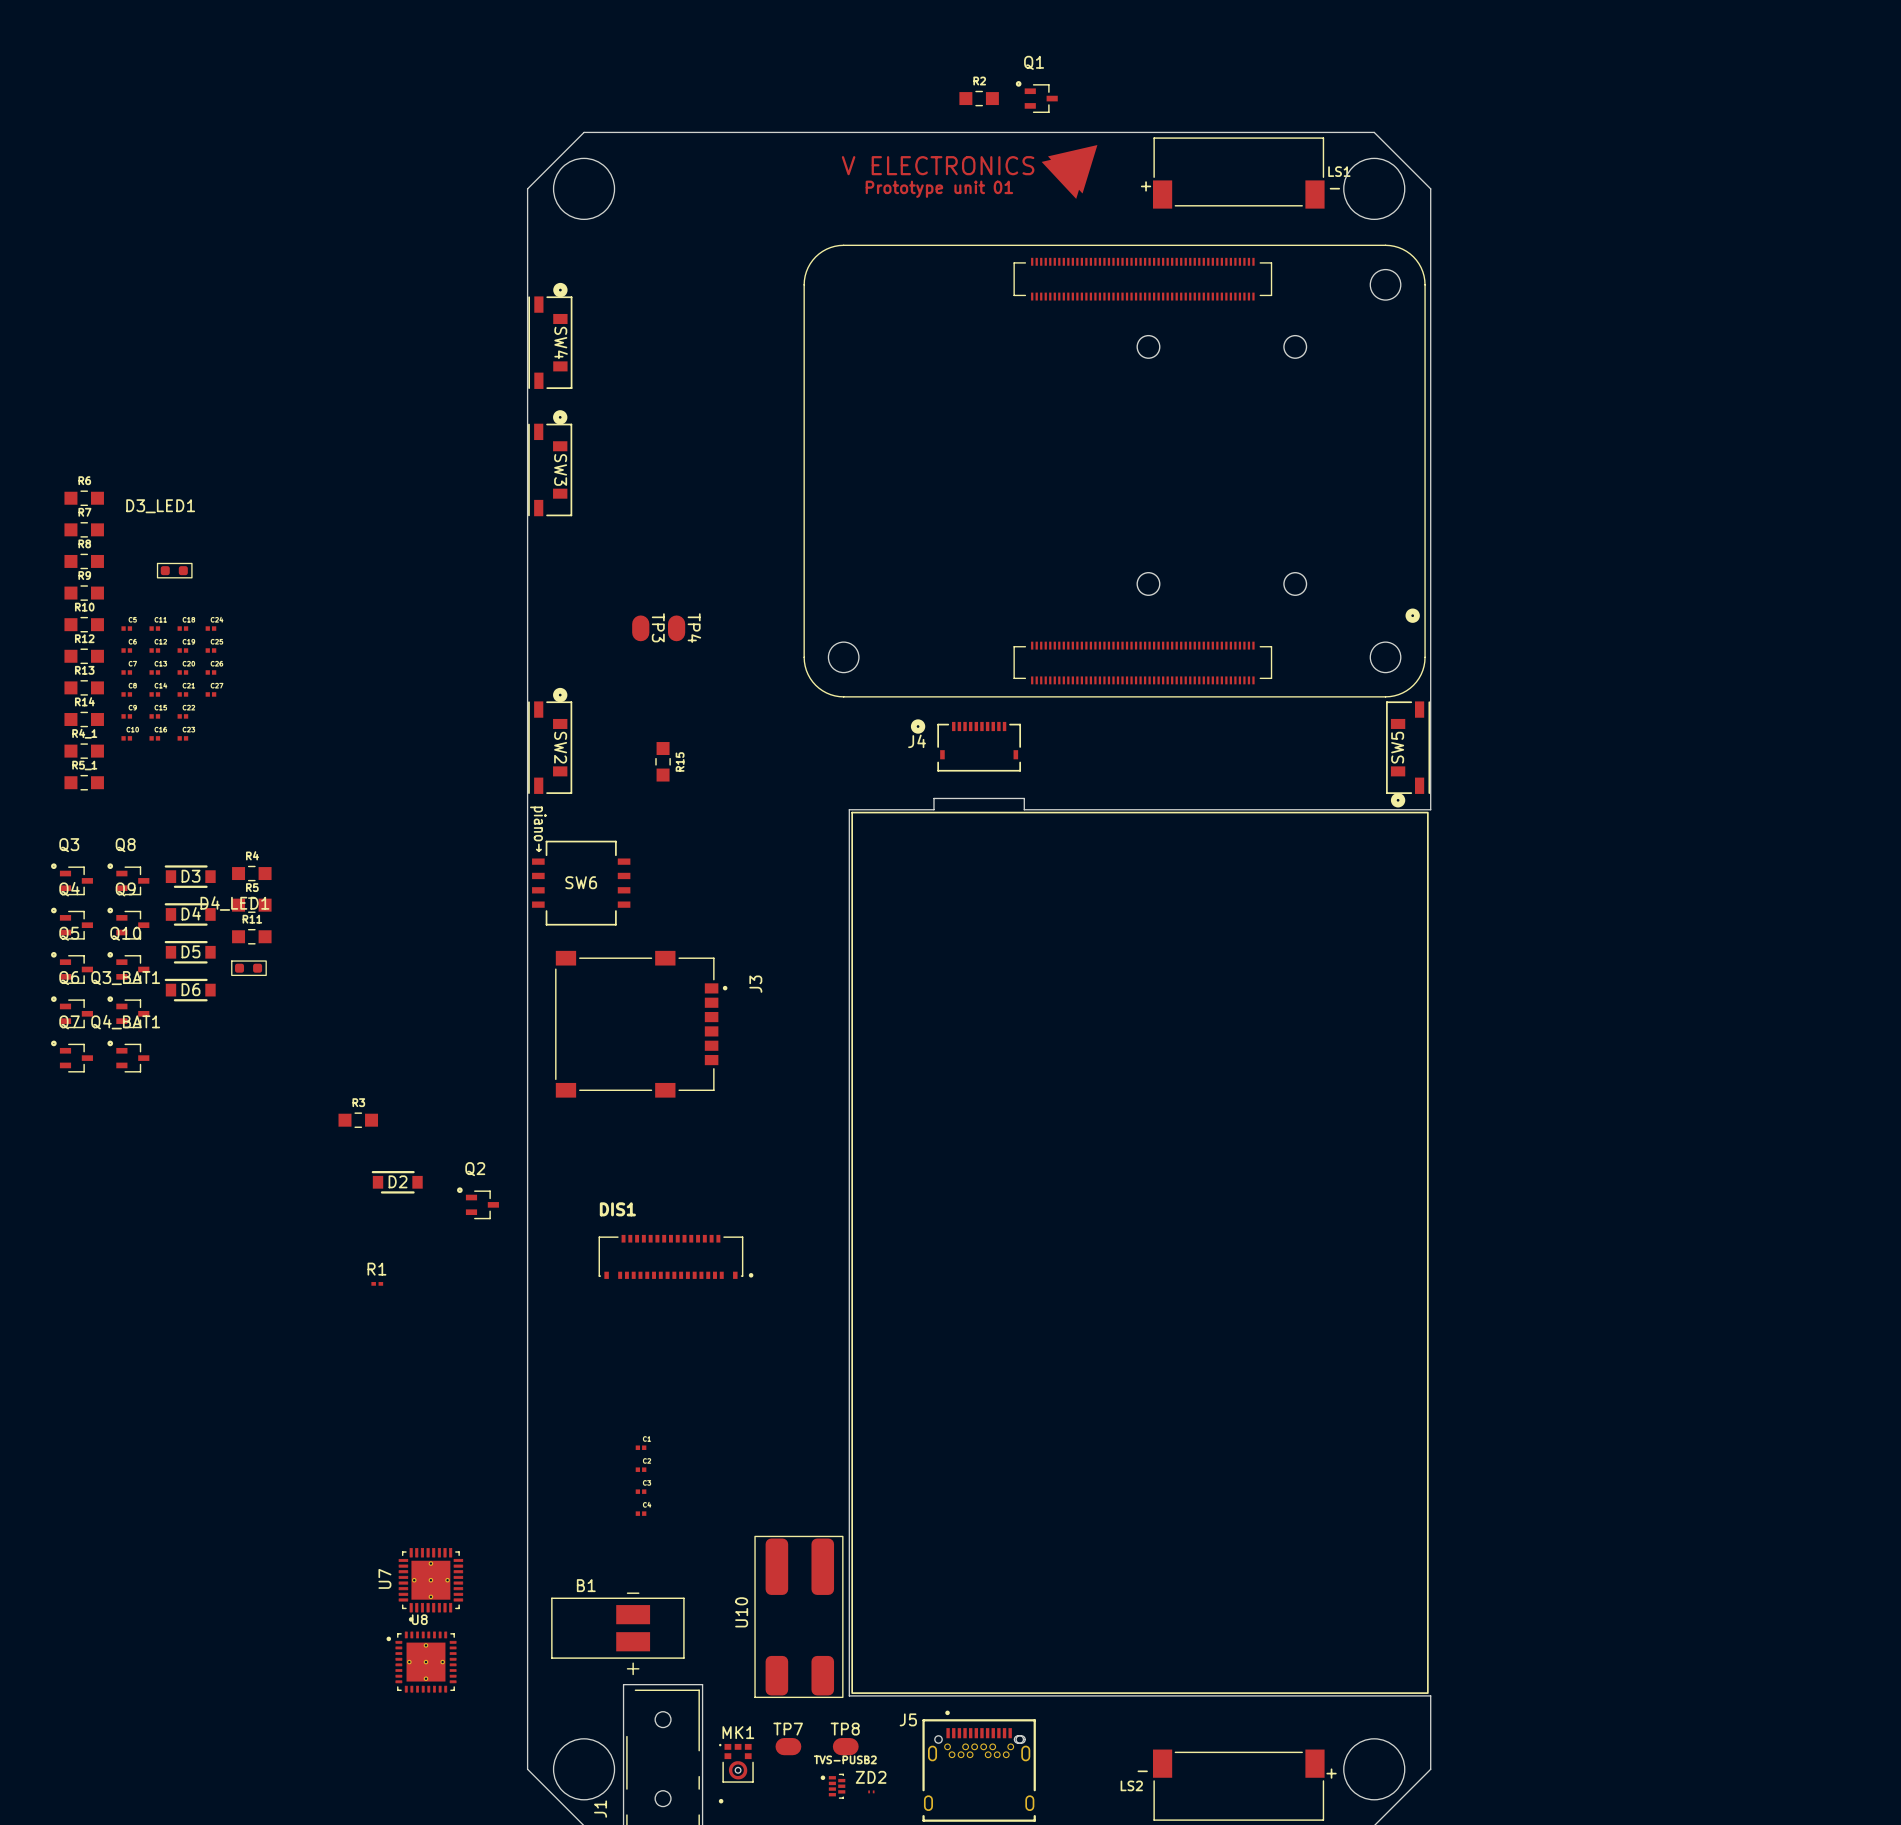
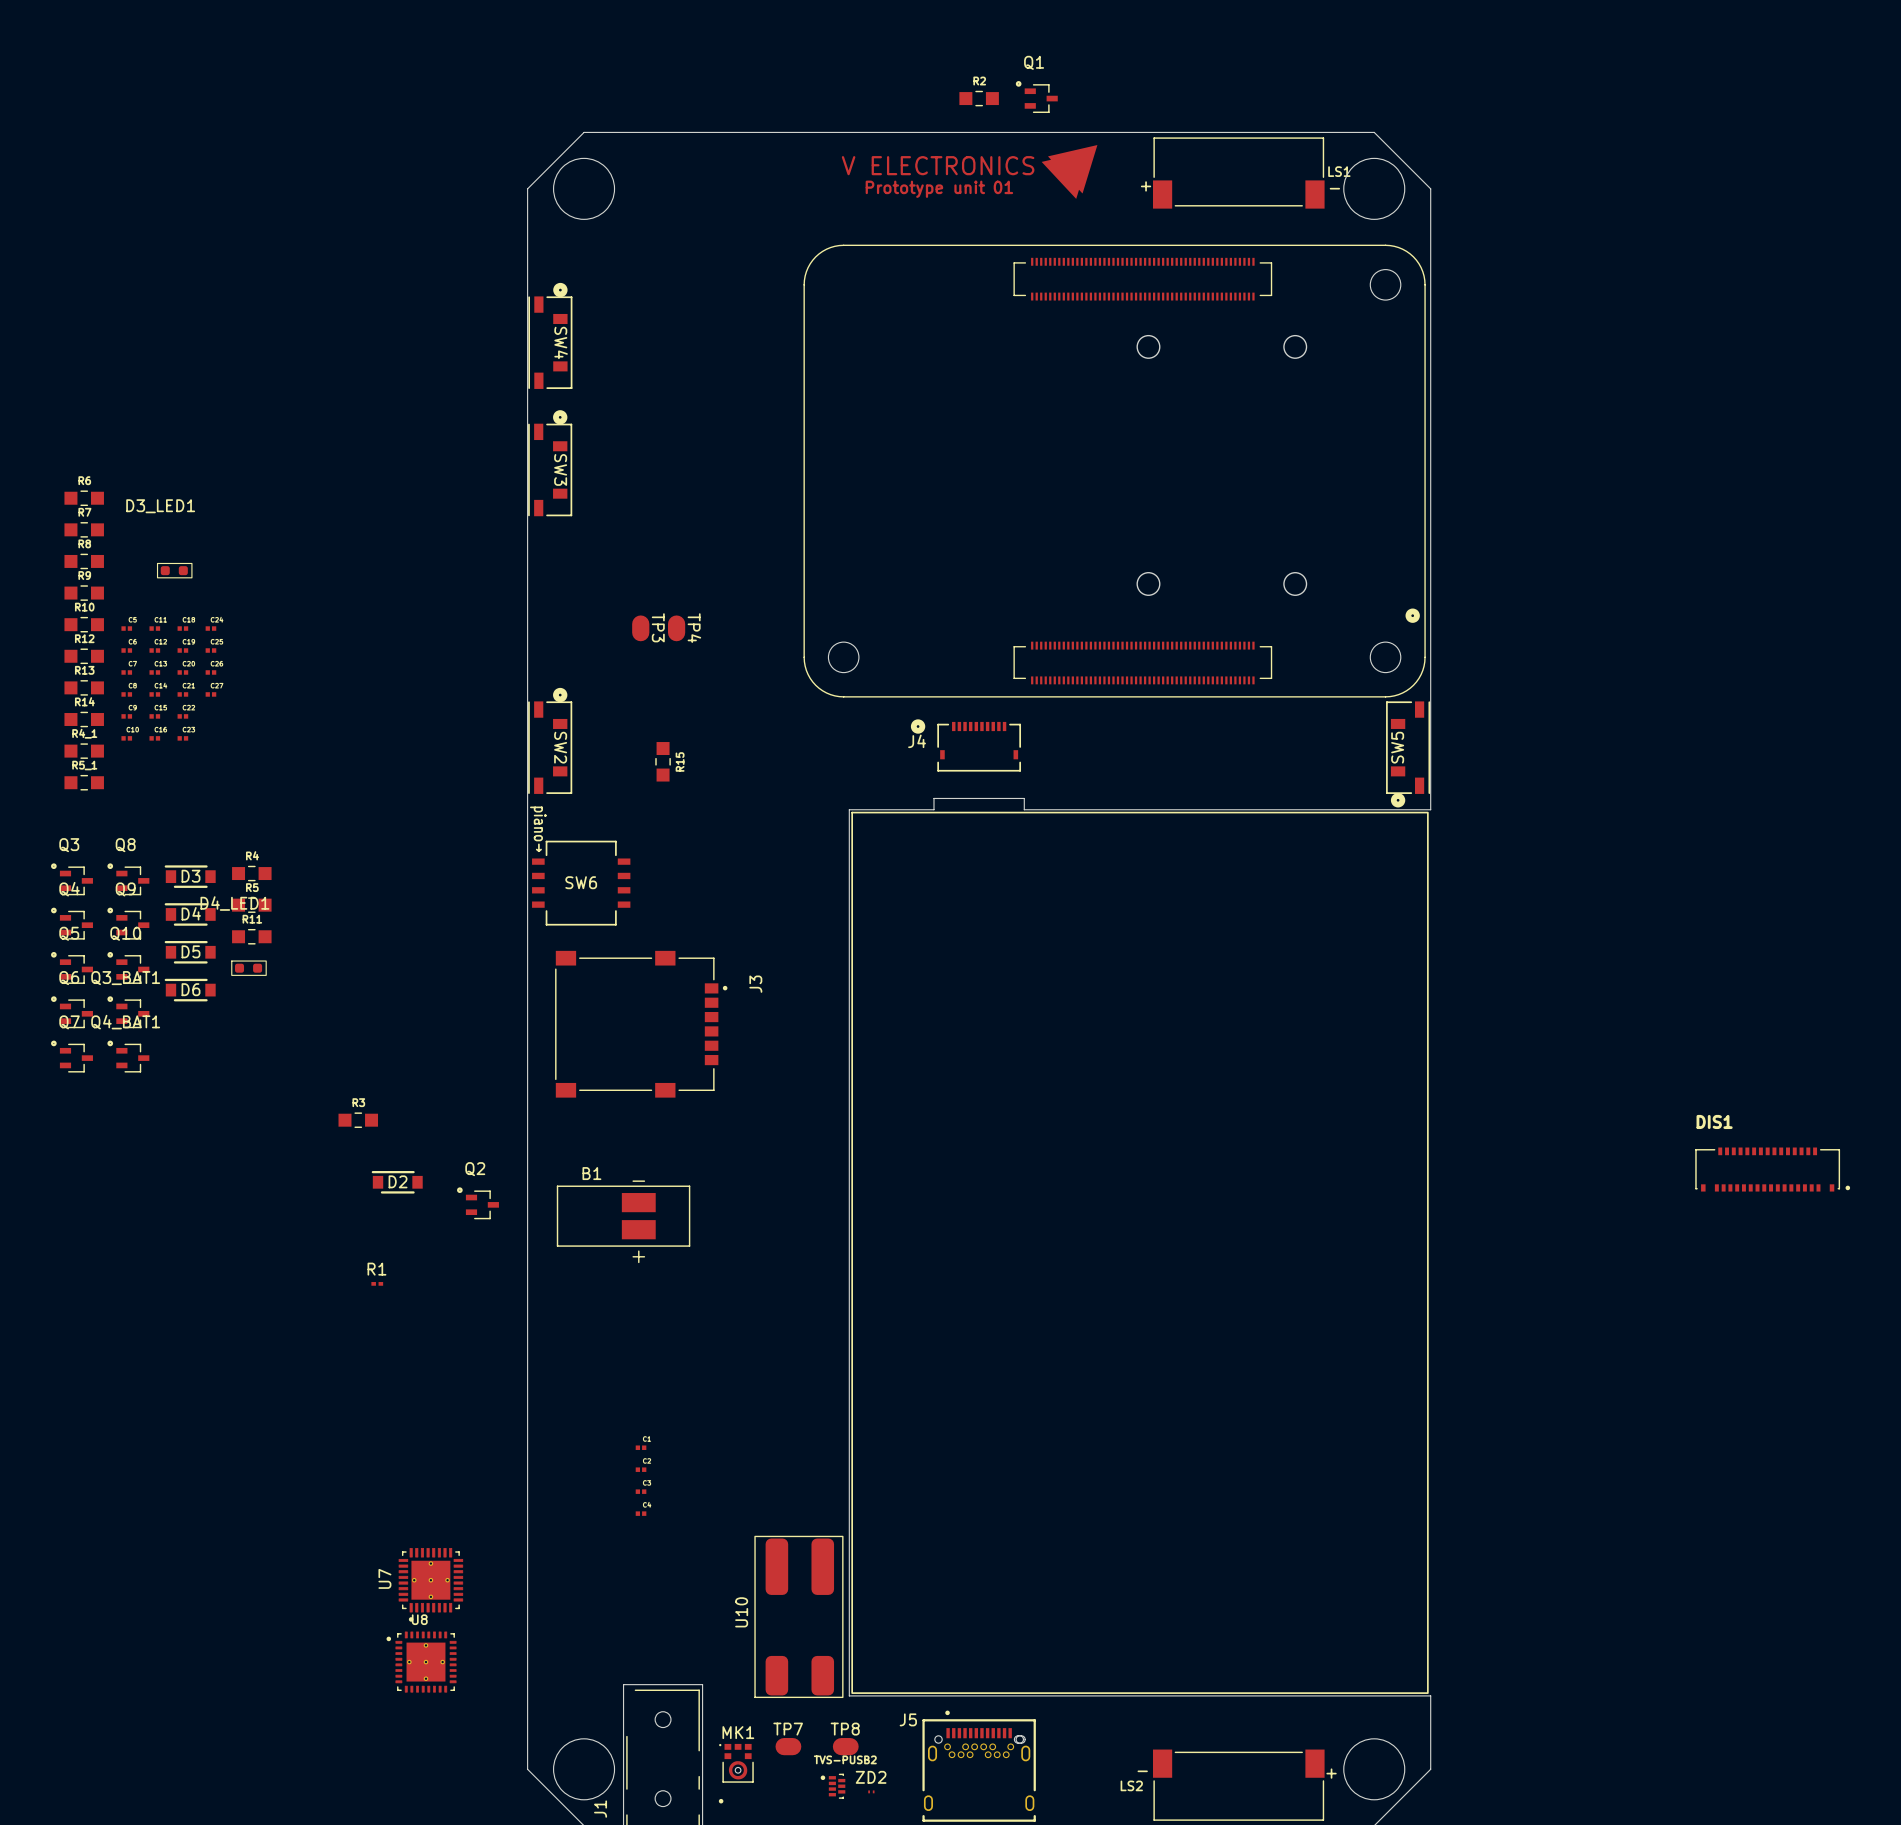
DIS1 position: (675, 1256) -> (1772, 1169)
B1 position: (617, 1633) -> (623, 1221)

